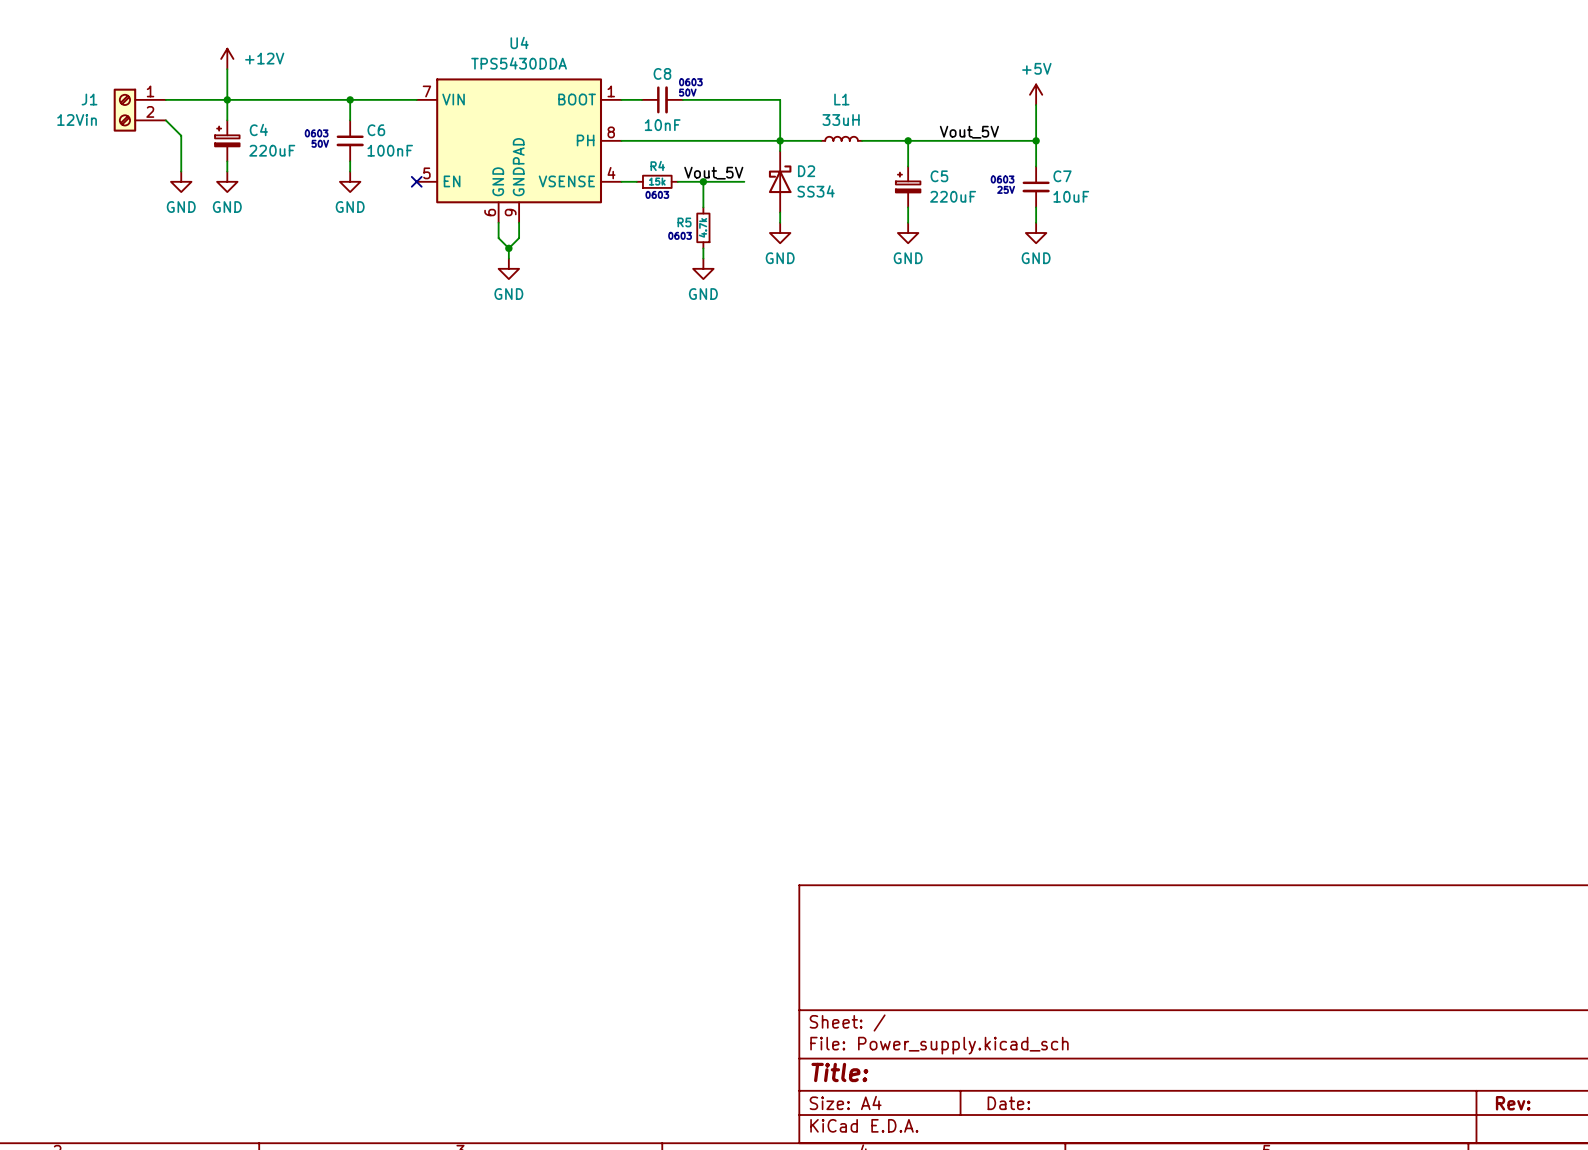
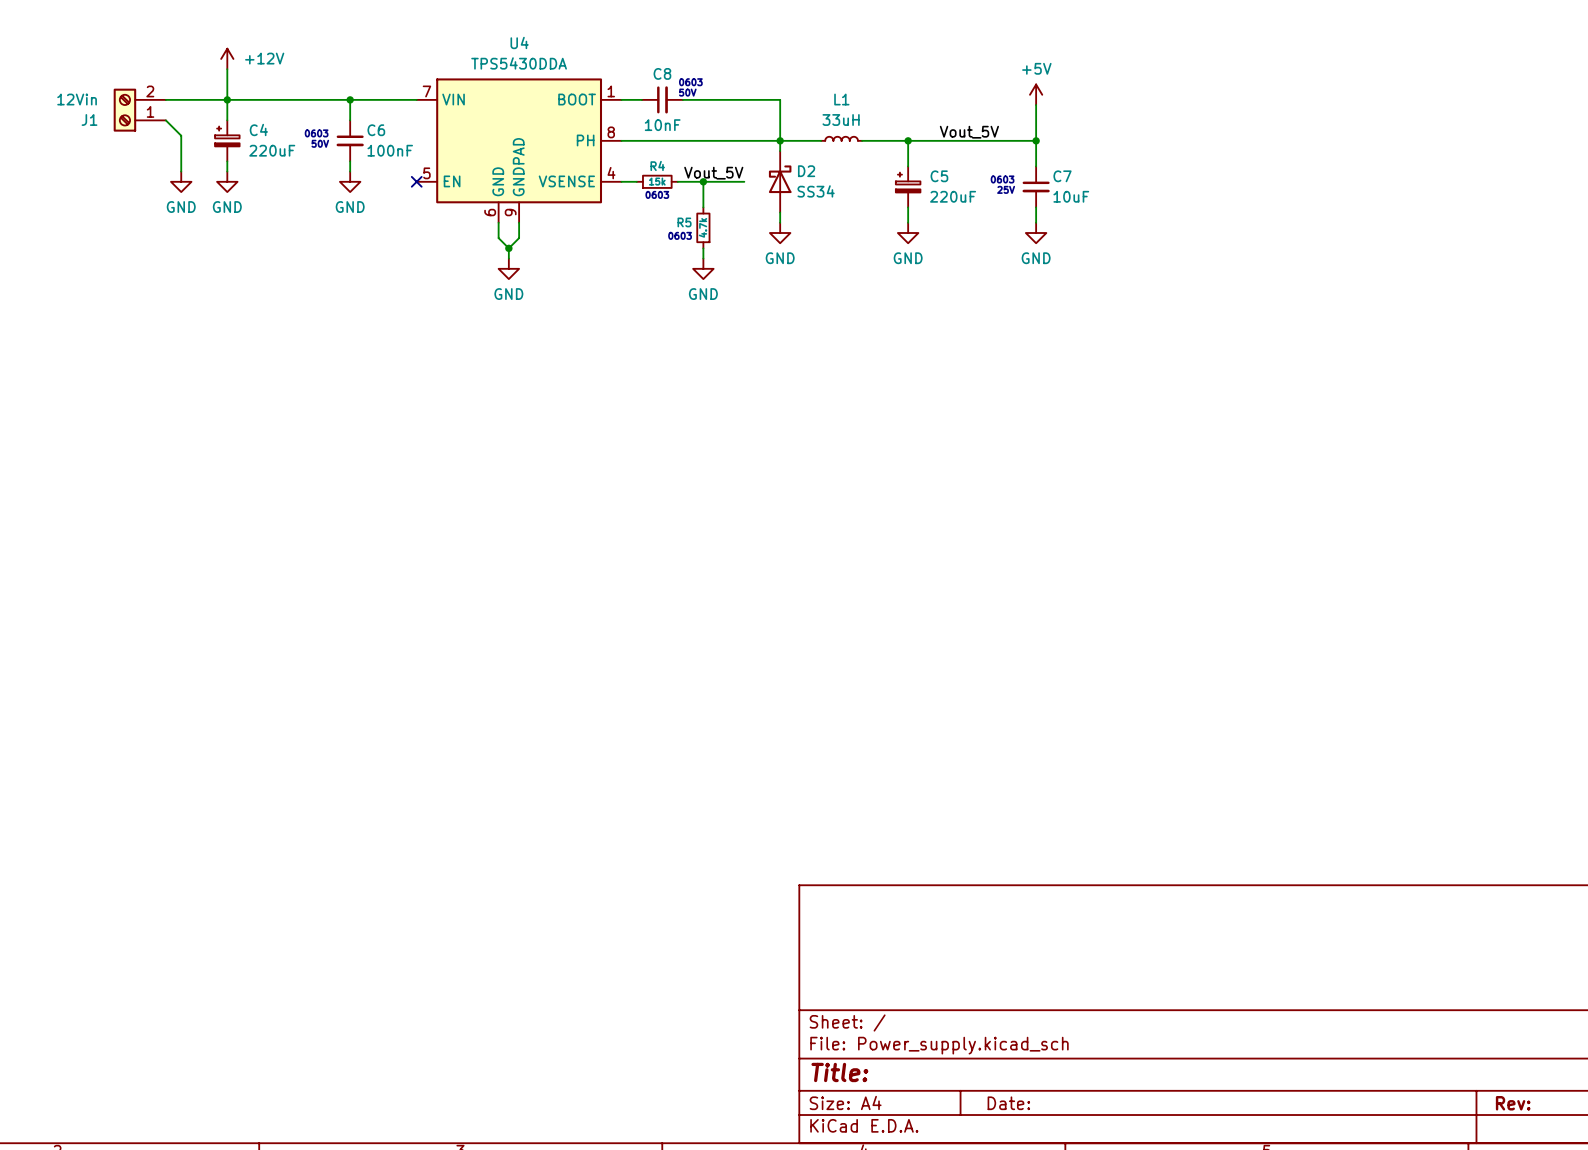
J1 flip: as is (124, 110) -> up-down (124, 110)

